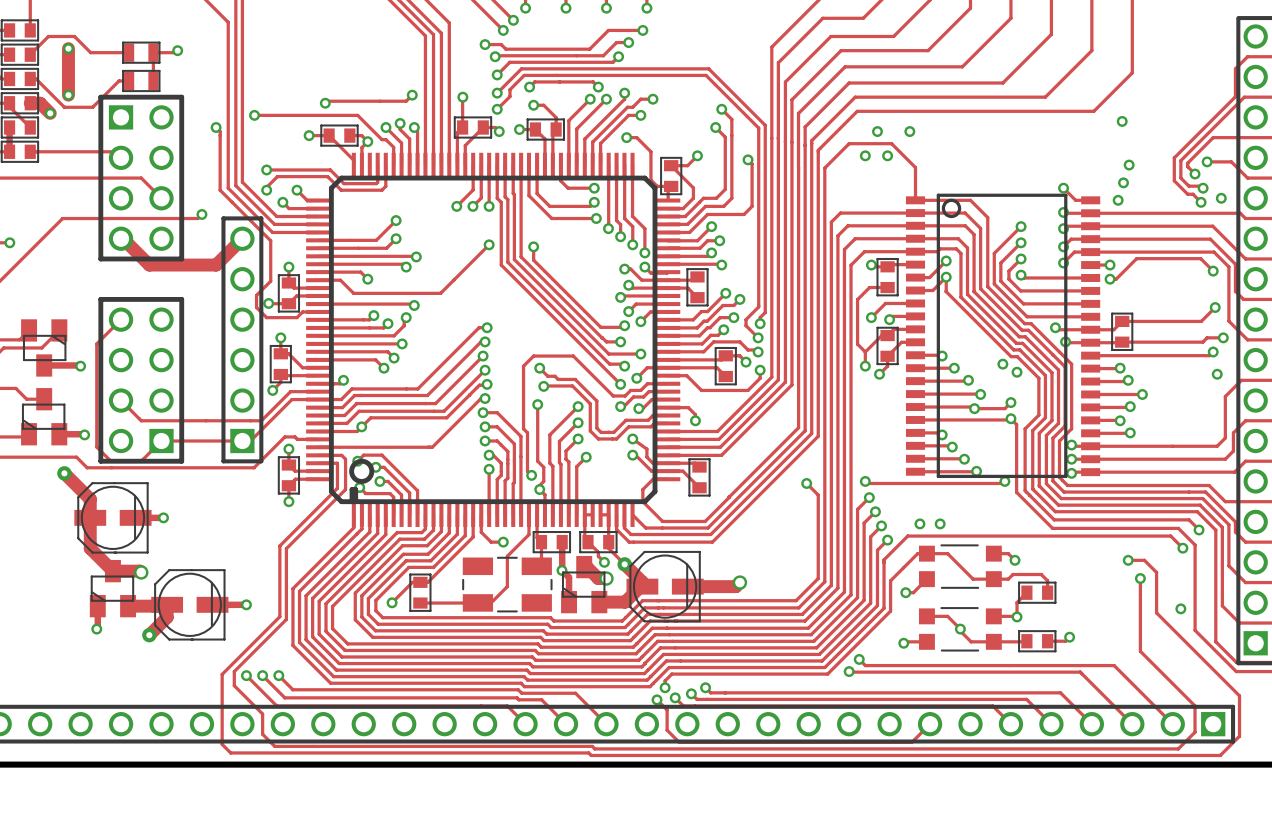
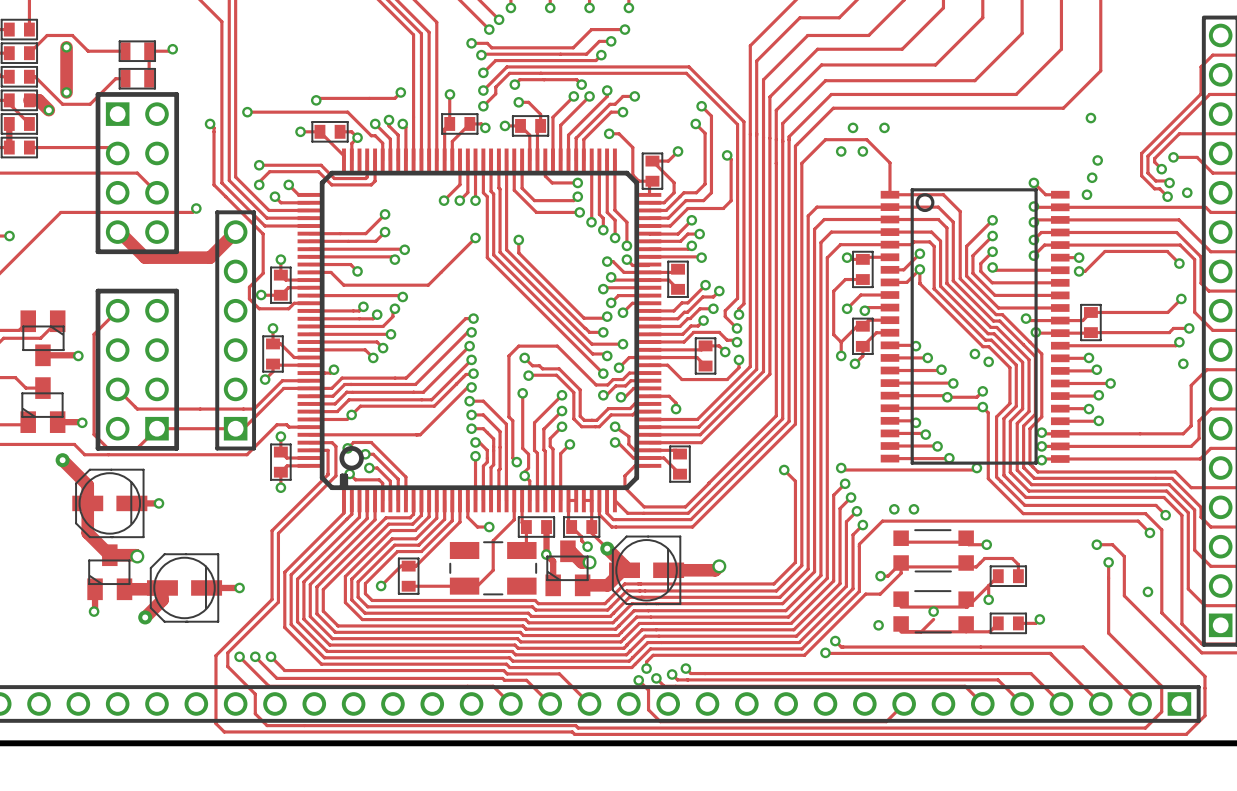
track: (993, 553) (1008, 553) (1015, 560) -> (901, 542) (966, 542) (968, 544) (986, 544)
track: (1008, 579) (973, 579) (947, 553) (917, 553) (890, 580) (890, 611) -> (980, 563) (976, 566) (901, 566) (901, 573) (880, 594) (865, 594)
track: none -> (988, 585) (967, 607) (901, 607)
track: (926, 616) (947, 616) (971, 641) (1026, 641) -> (901, 631) (989, 631) (997, 623)
track: (993, 616) (1016, 616) -> none
track: none -> (933, 619) (921, 631)
track: (905, 641) (926, 641) -> none

